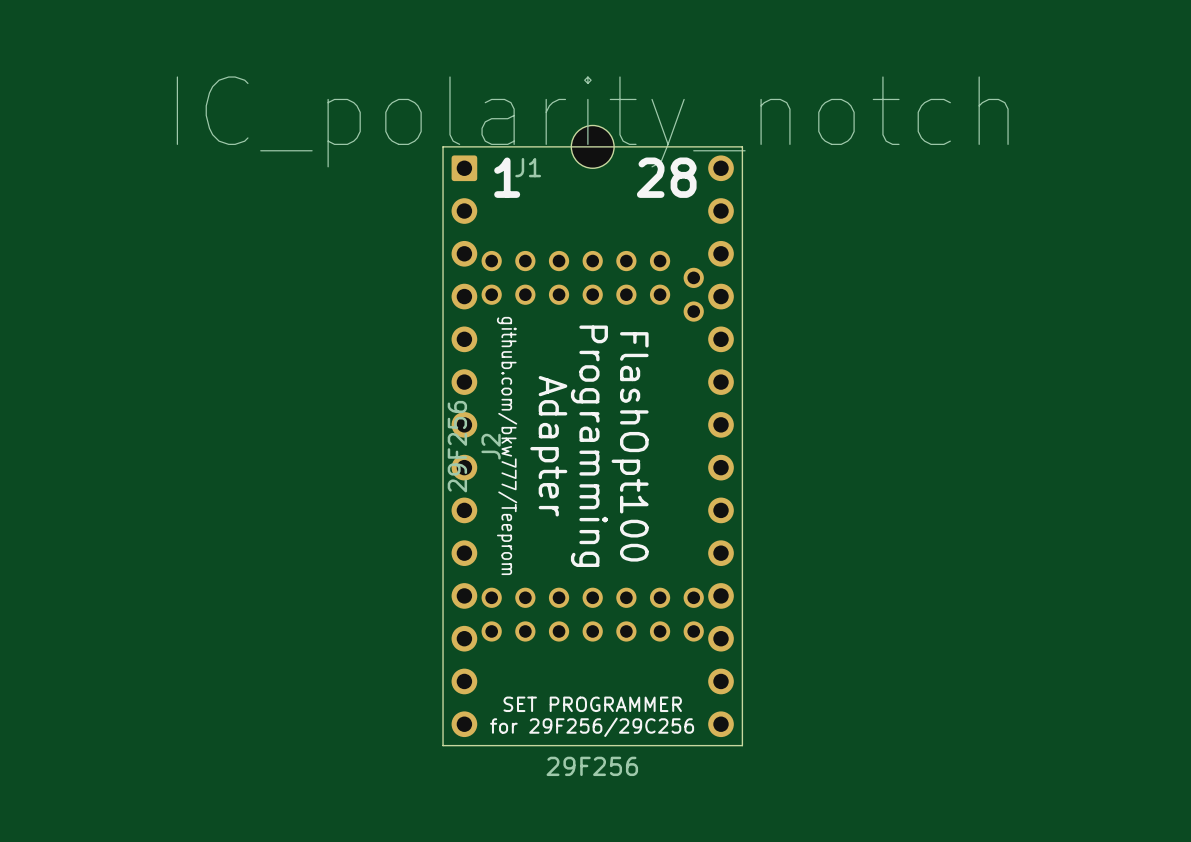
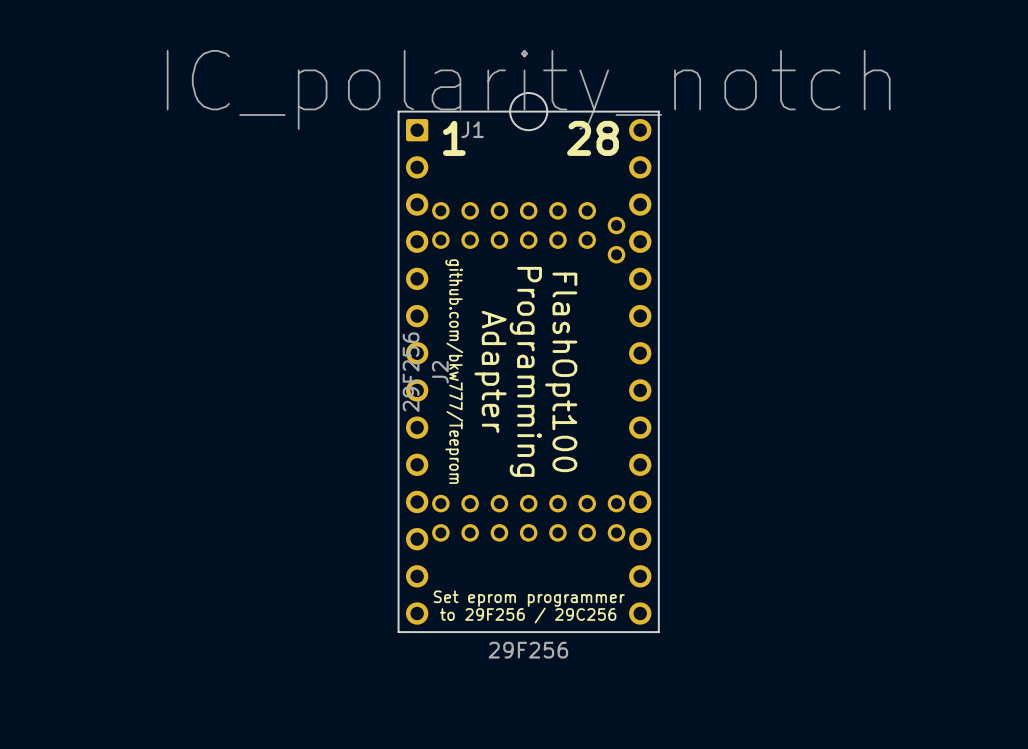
text: SET PROGRAMMER (592, 704) -> Set eprom programmer (529, 598)
text: for 29F256/29C256 (592, 727) -> to 29F256 / 29C256 (528, 615)

